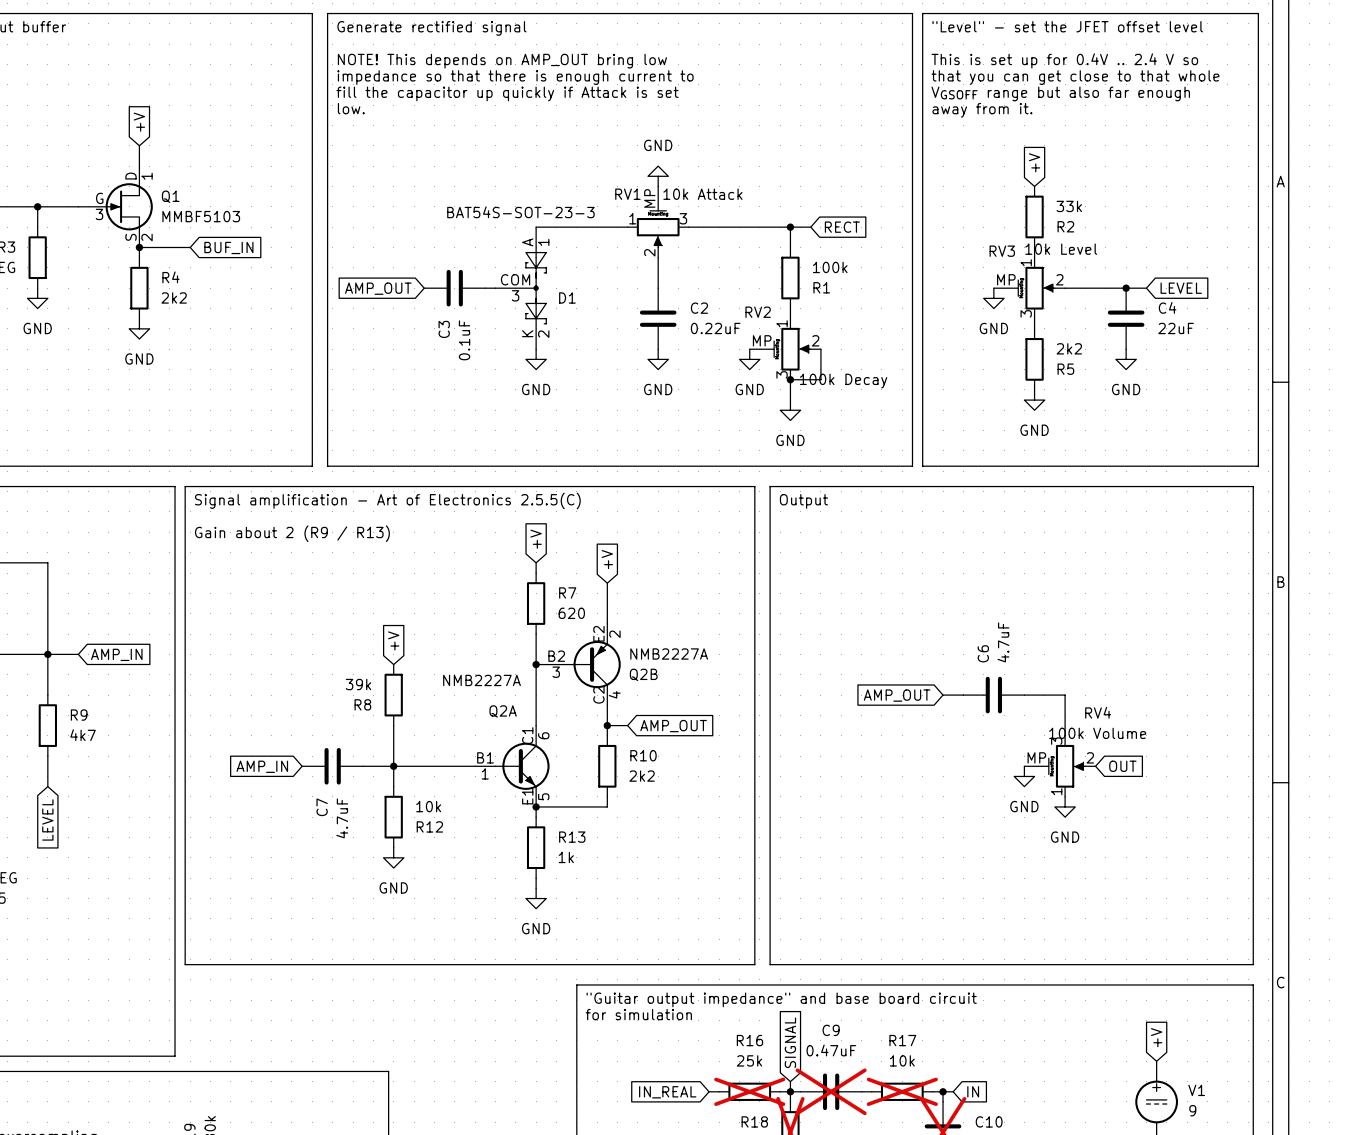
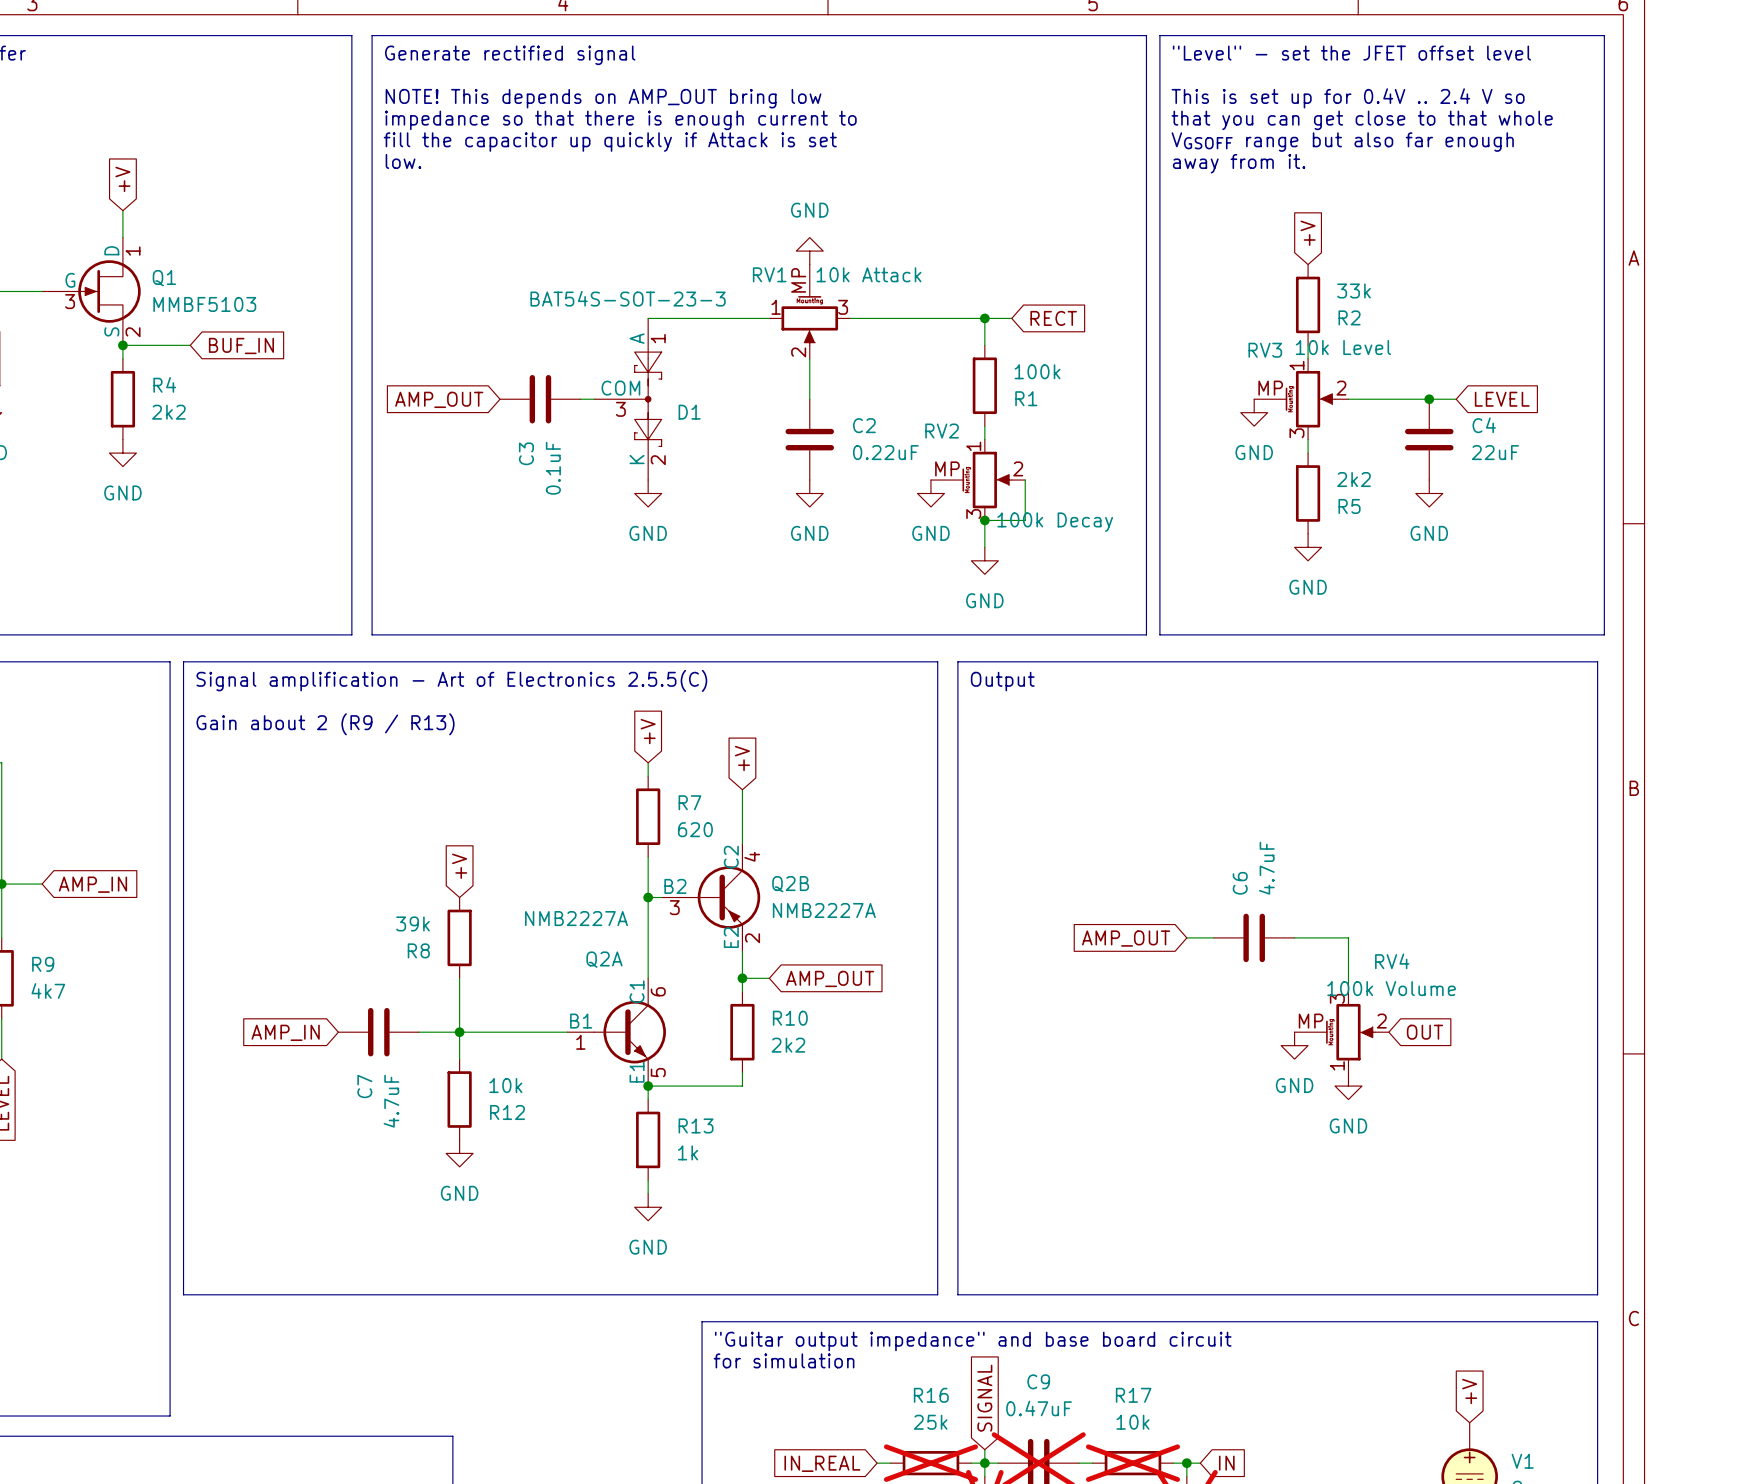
Q2B flip: as is (593, 664) -> up-down (724, 897)

